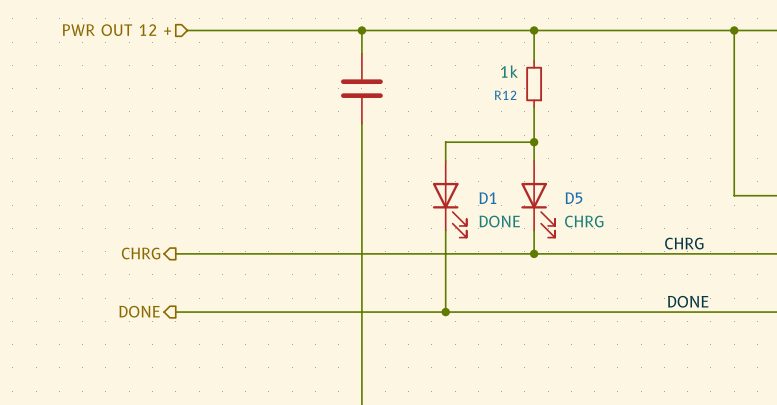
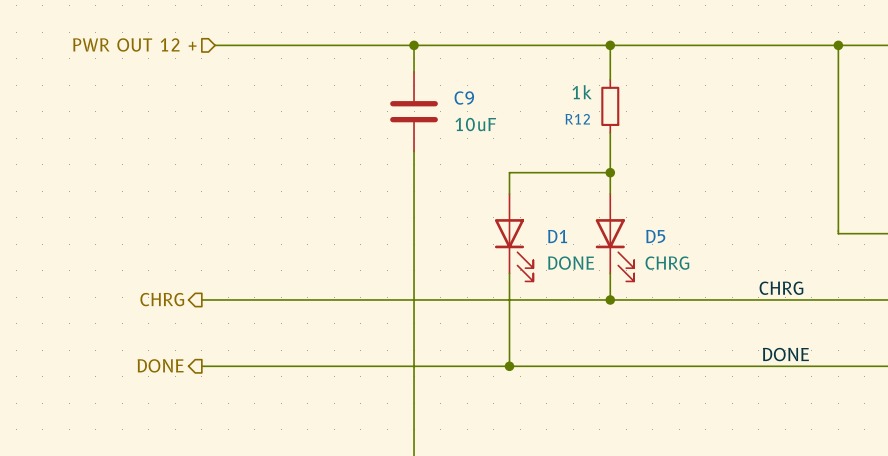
C9 name: none -> C9 (464, 98)
C9 value: none -> 10uF (475, 124)

